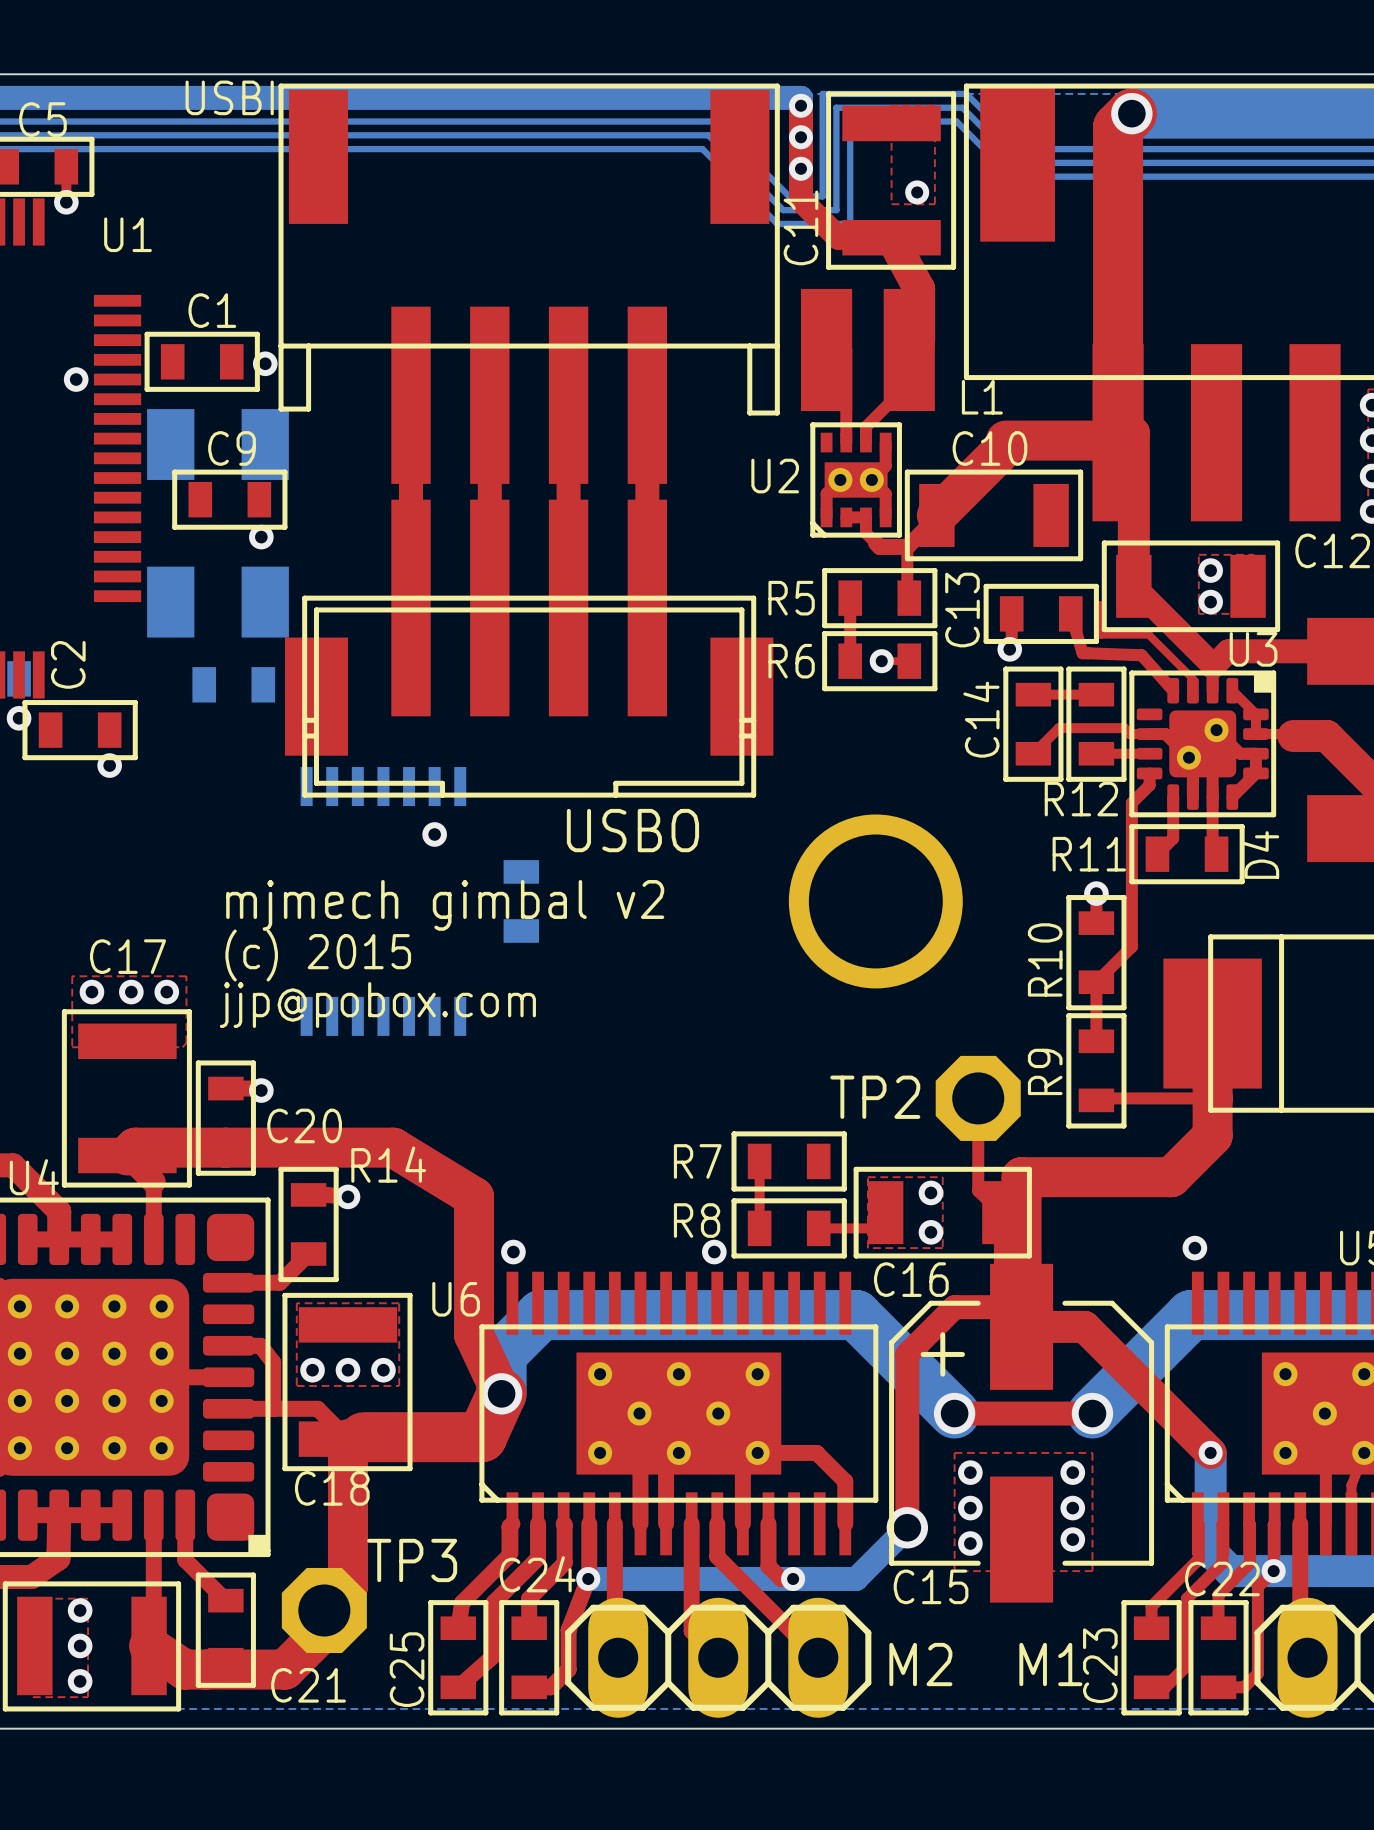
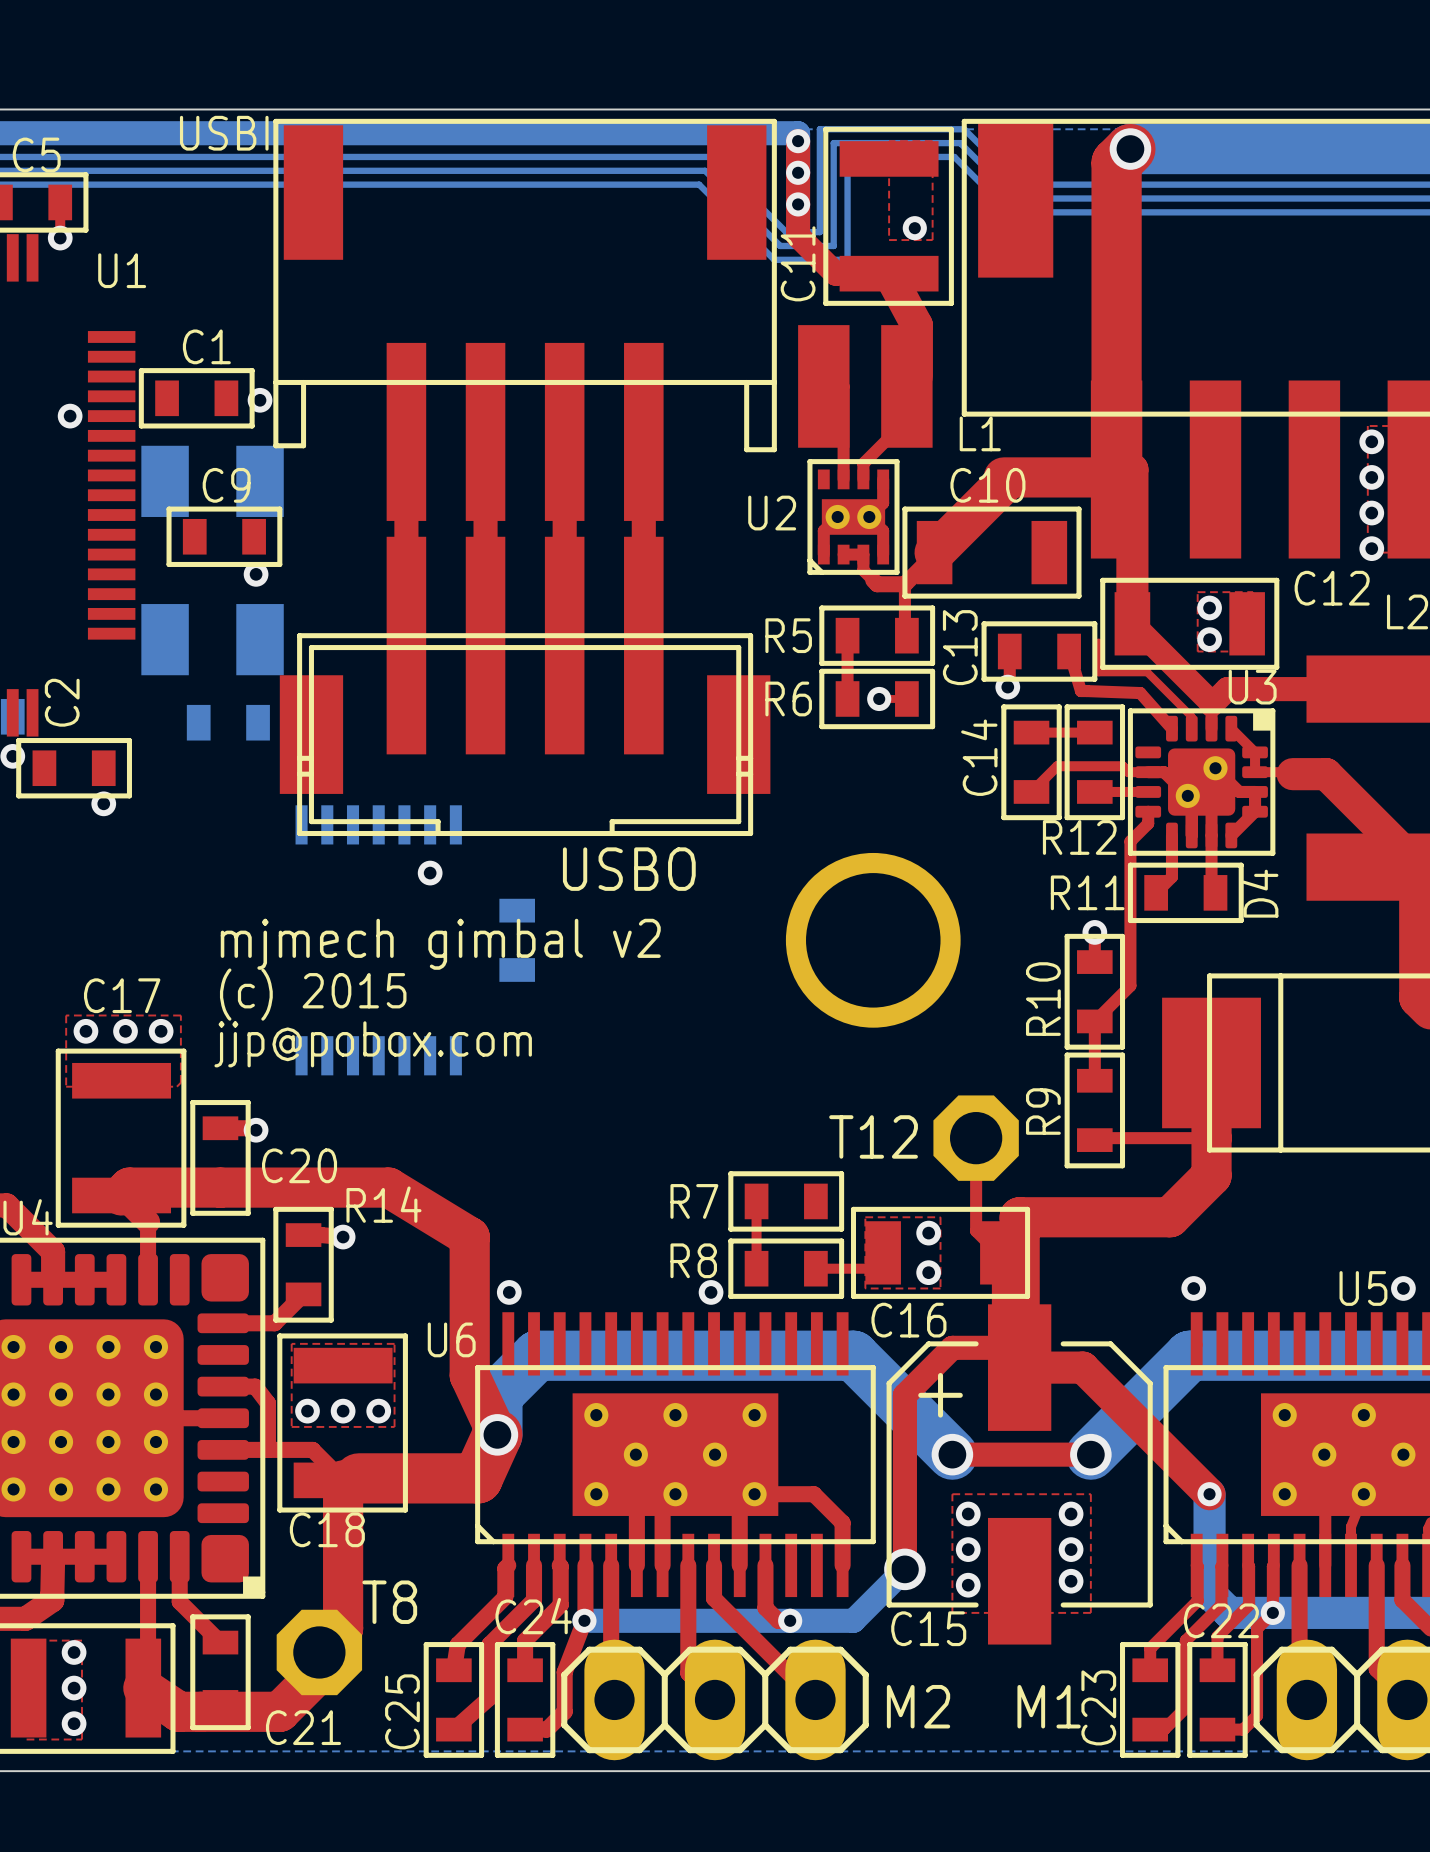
TP2 name: TP2 (875, 1097) -> T12 (873, 1136)
TP3 name: TP3 (412, 1560) -> T8 (389, 1602)

